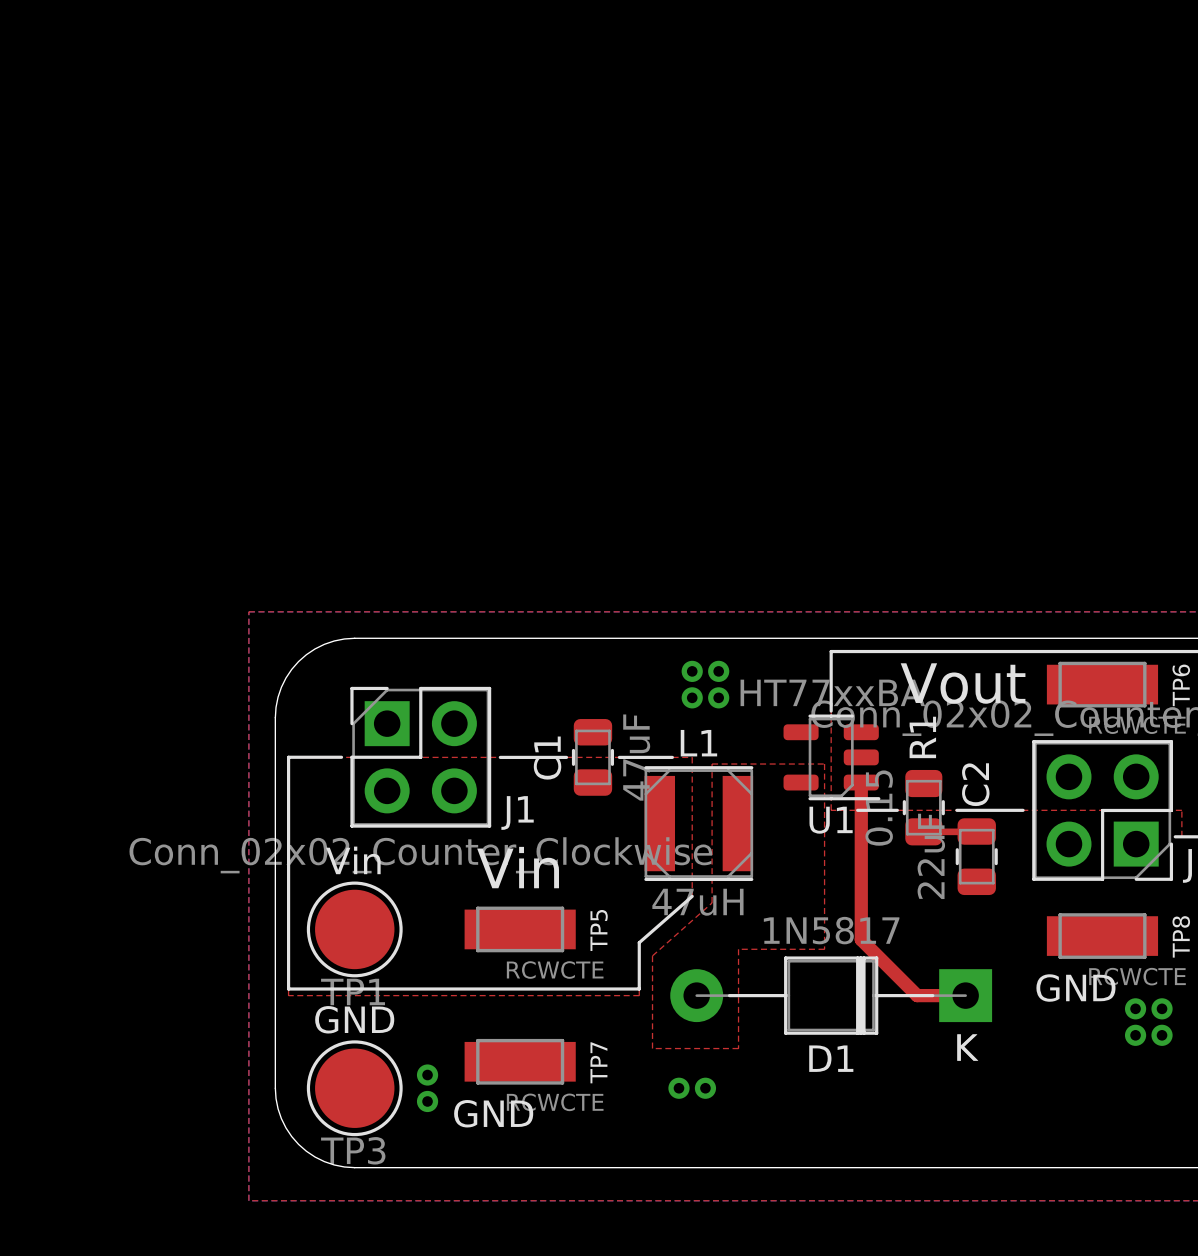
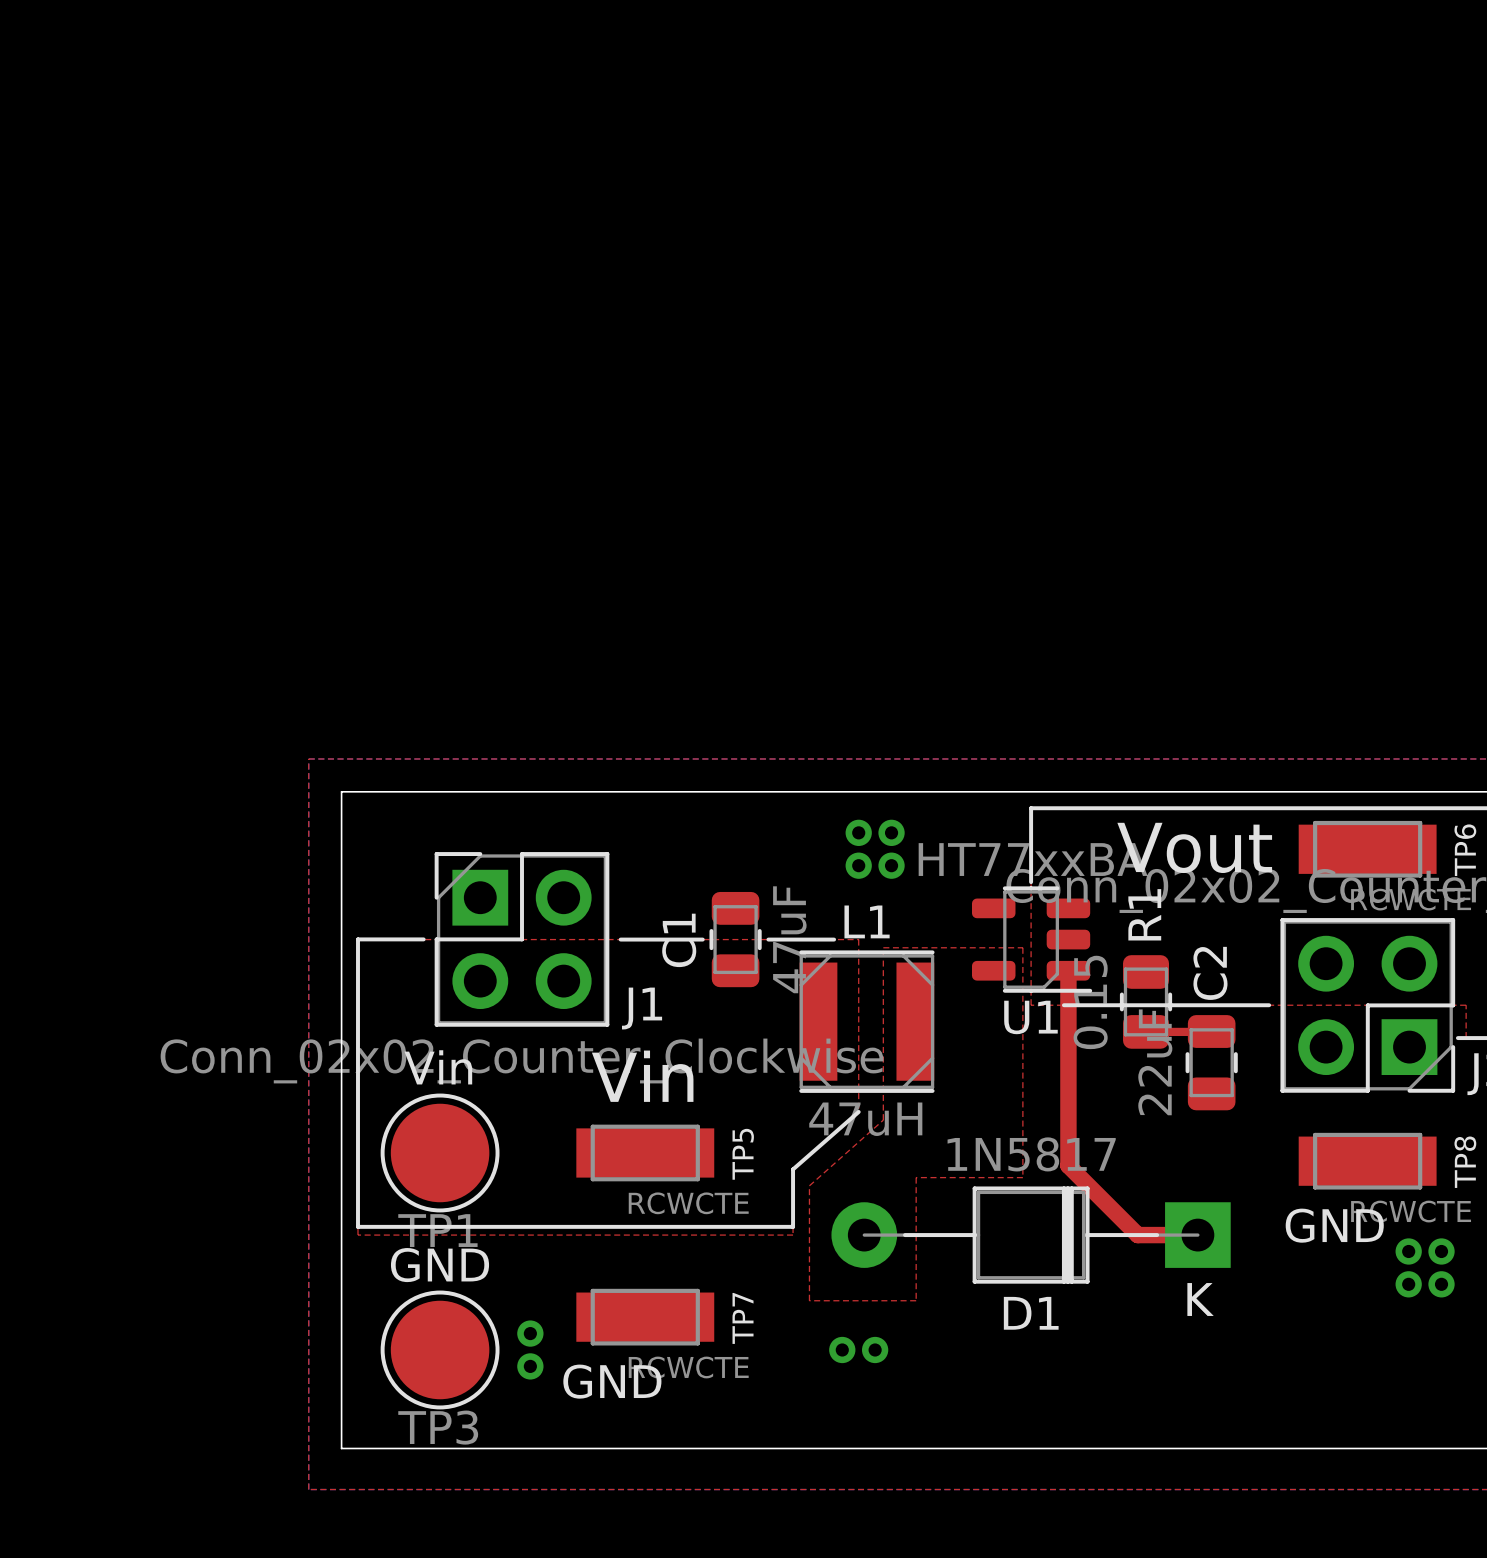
board edge: (354, 638) (324, 644) (298, 661) (281, 687) (275, 717) -> (440, 791) (341, 791) (341, 890)
line: none -> (1113, 1005) (1187, 1005)
board edge: (275, 1088) (281, 1118) (298, 1144) (324, 1161) (354, 1167) -> (341, 1349) (341, 1448) (440, 1448)

